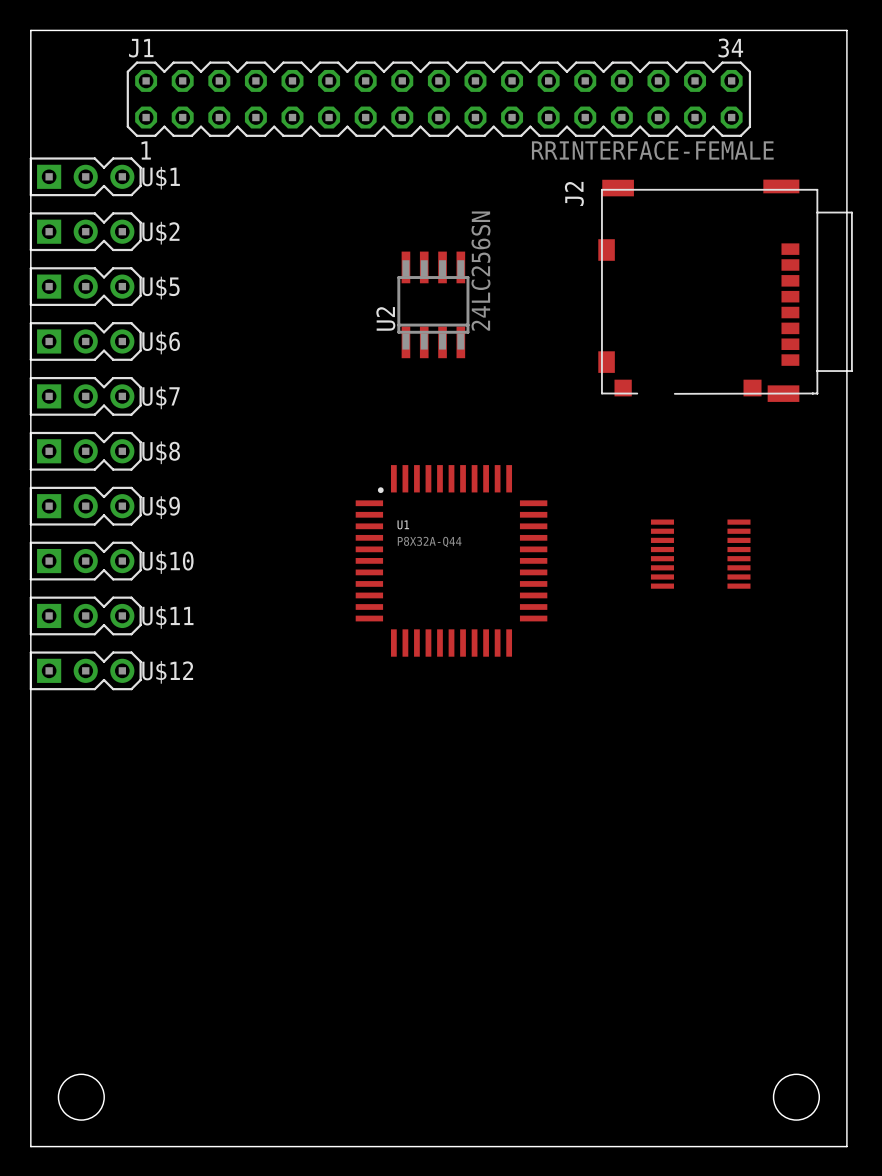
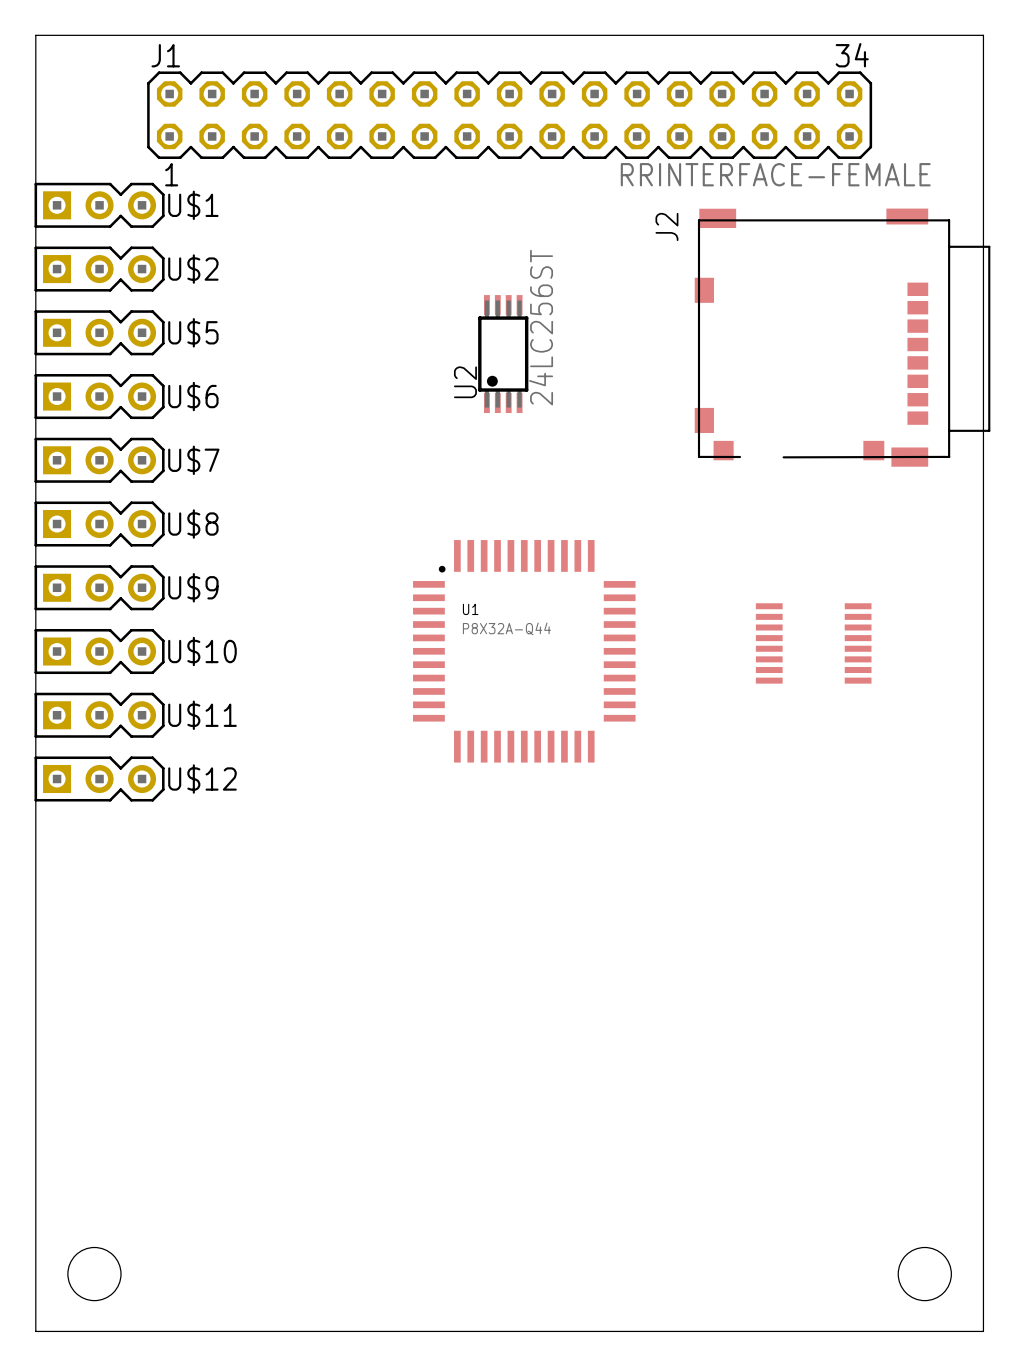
U2 footprint: [397, 251, 470, 359] -> [478, 295, 529, 414]
U2 value: 24LC256SN (480, 271) -> 24LC256ST (541, 327)

